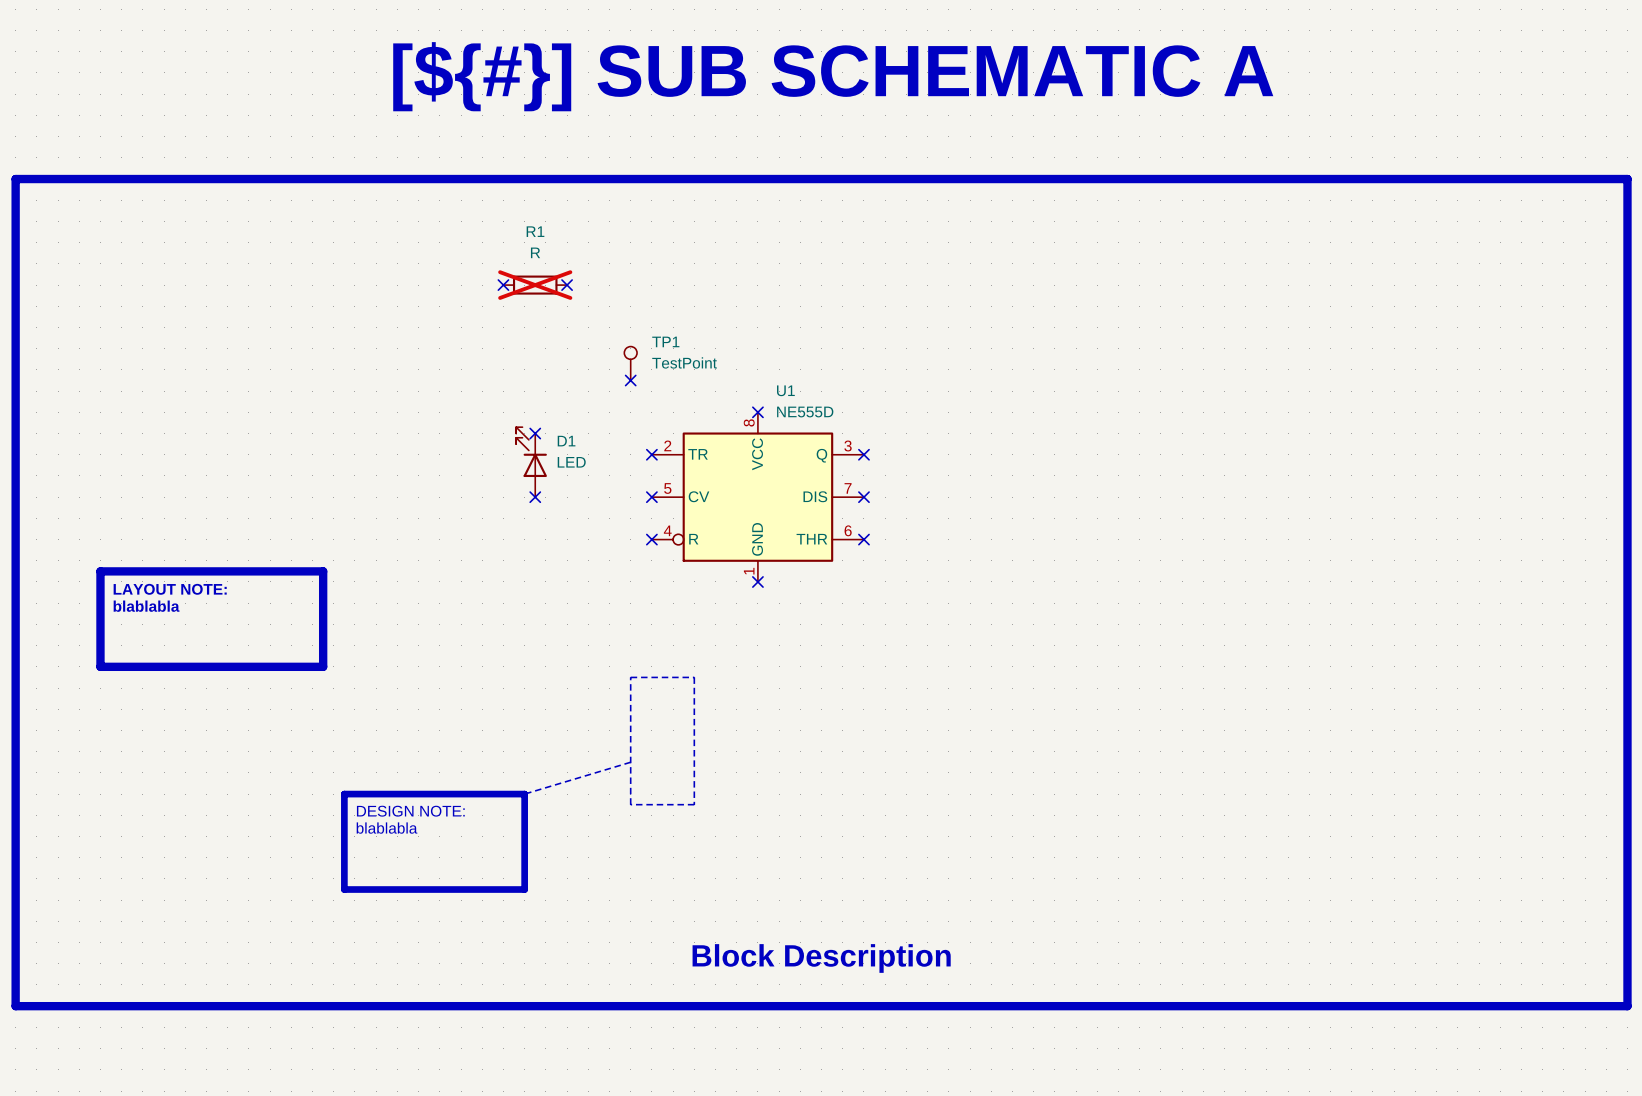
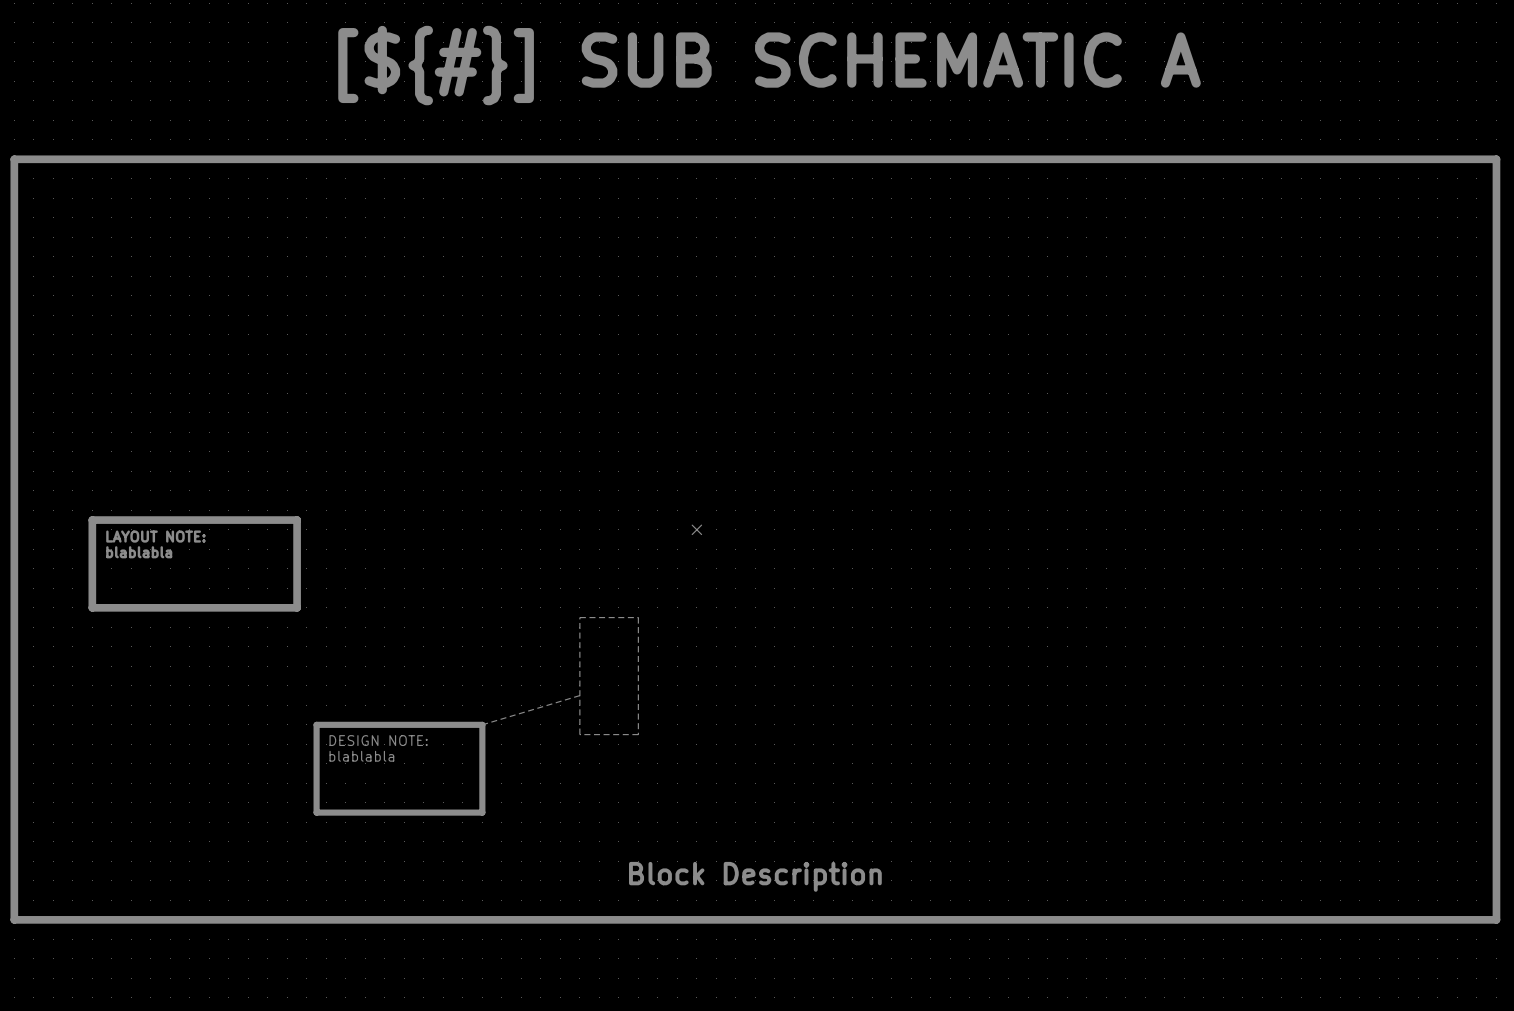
no-connect mark: (503, 285) -> none
R1: R (535, 285) -> none
no-connect mark: (567, 285) -> none
TP1: TestPoint (630, 363) -> none
no-connect mark: (630, 380) -> none
no-connect mark: (757, 412) -> none
no-connect mark: (535, 433) -> none
no-connect mark: (651, 454) -> none
no-connect mark: (863, 454) -> none
D1: LED (531, 462) -> none
no-connect mark: (535, 497) -> none
no-connect mark: (651, 497) -> none
U1: NE555D (757, 497) -> none
no-connect mark: (863, 497) -> none
no-connect mark: (651, 539) -> none
no-connect mark: (863, 539) -> none

